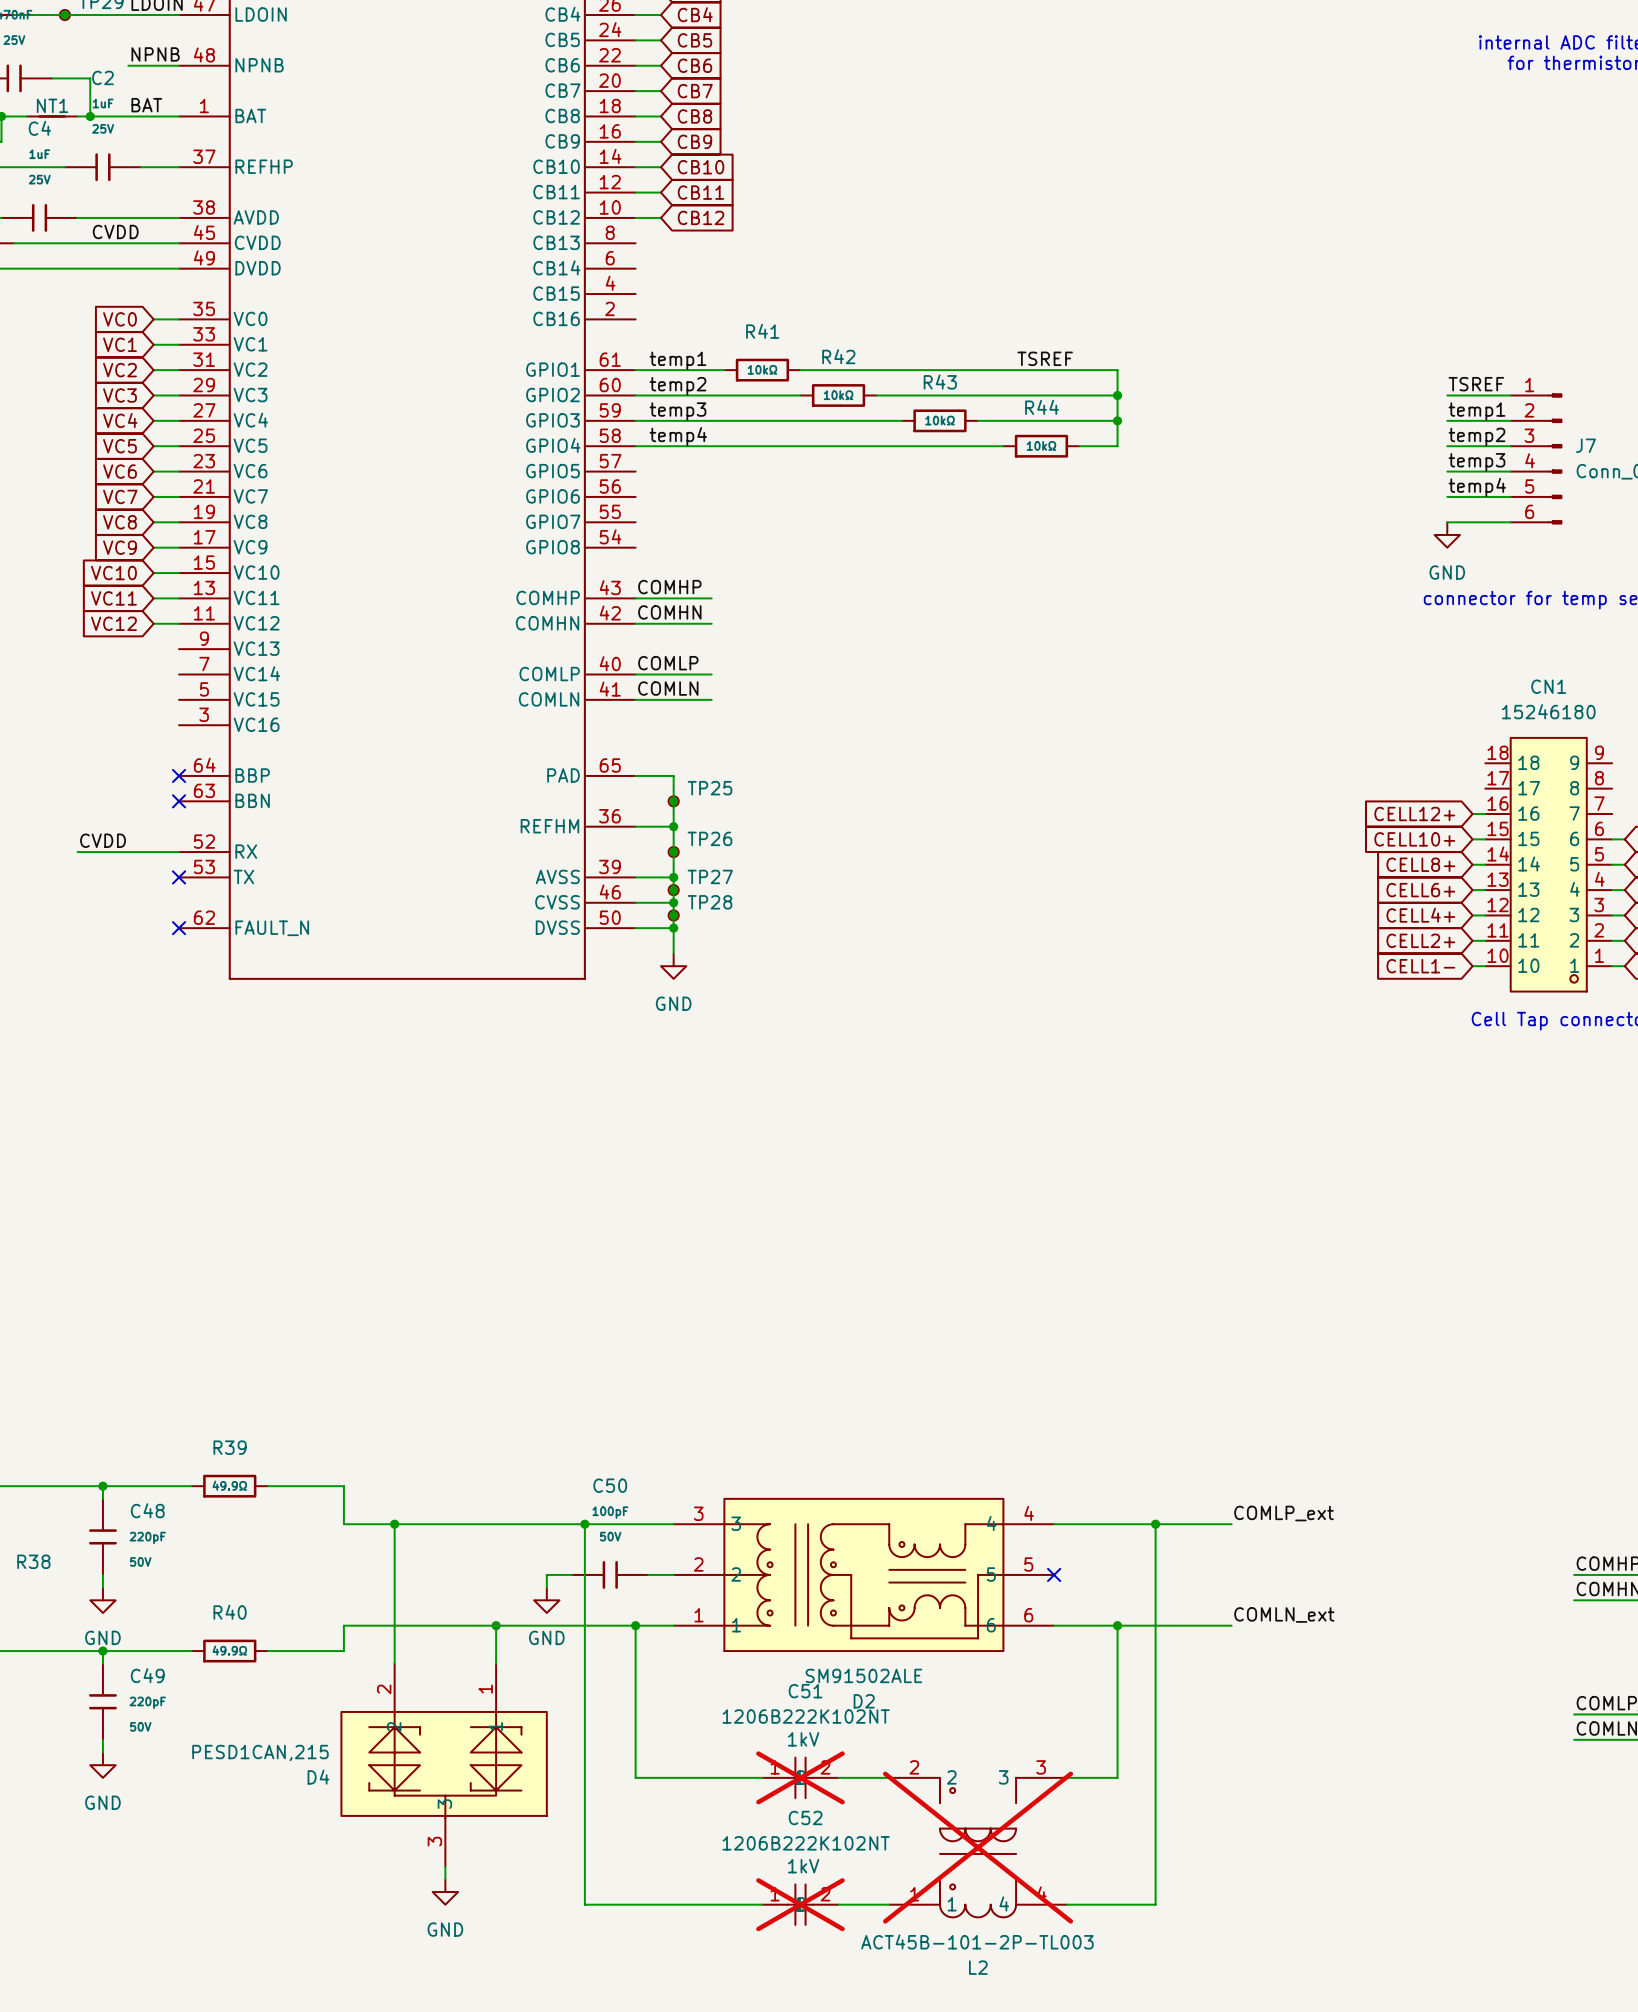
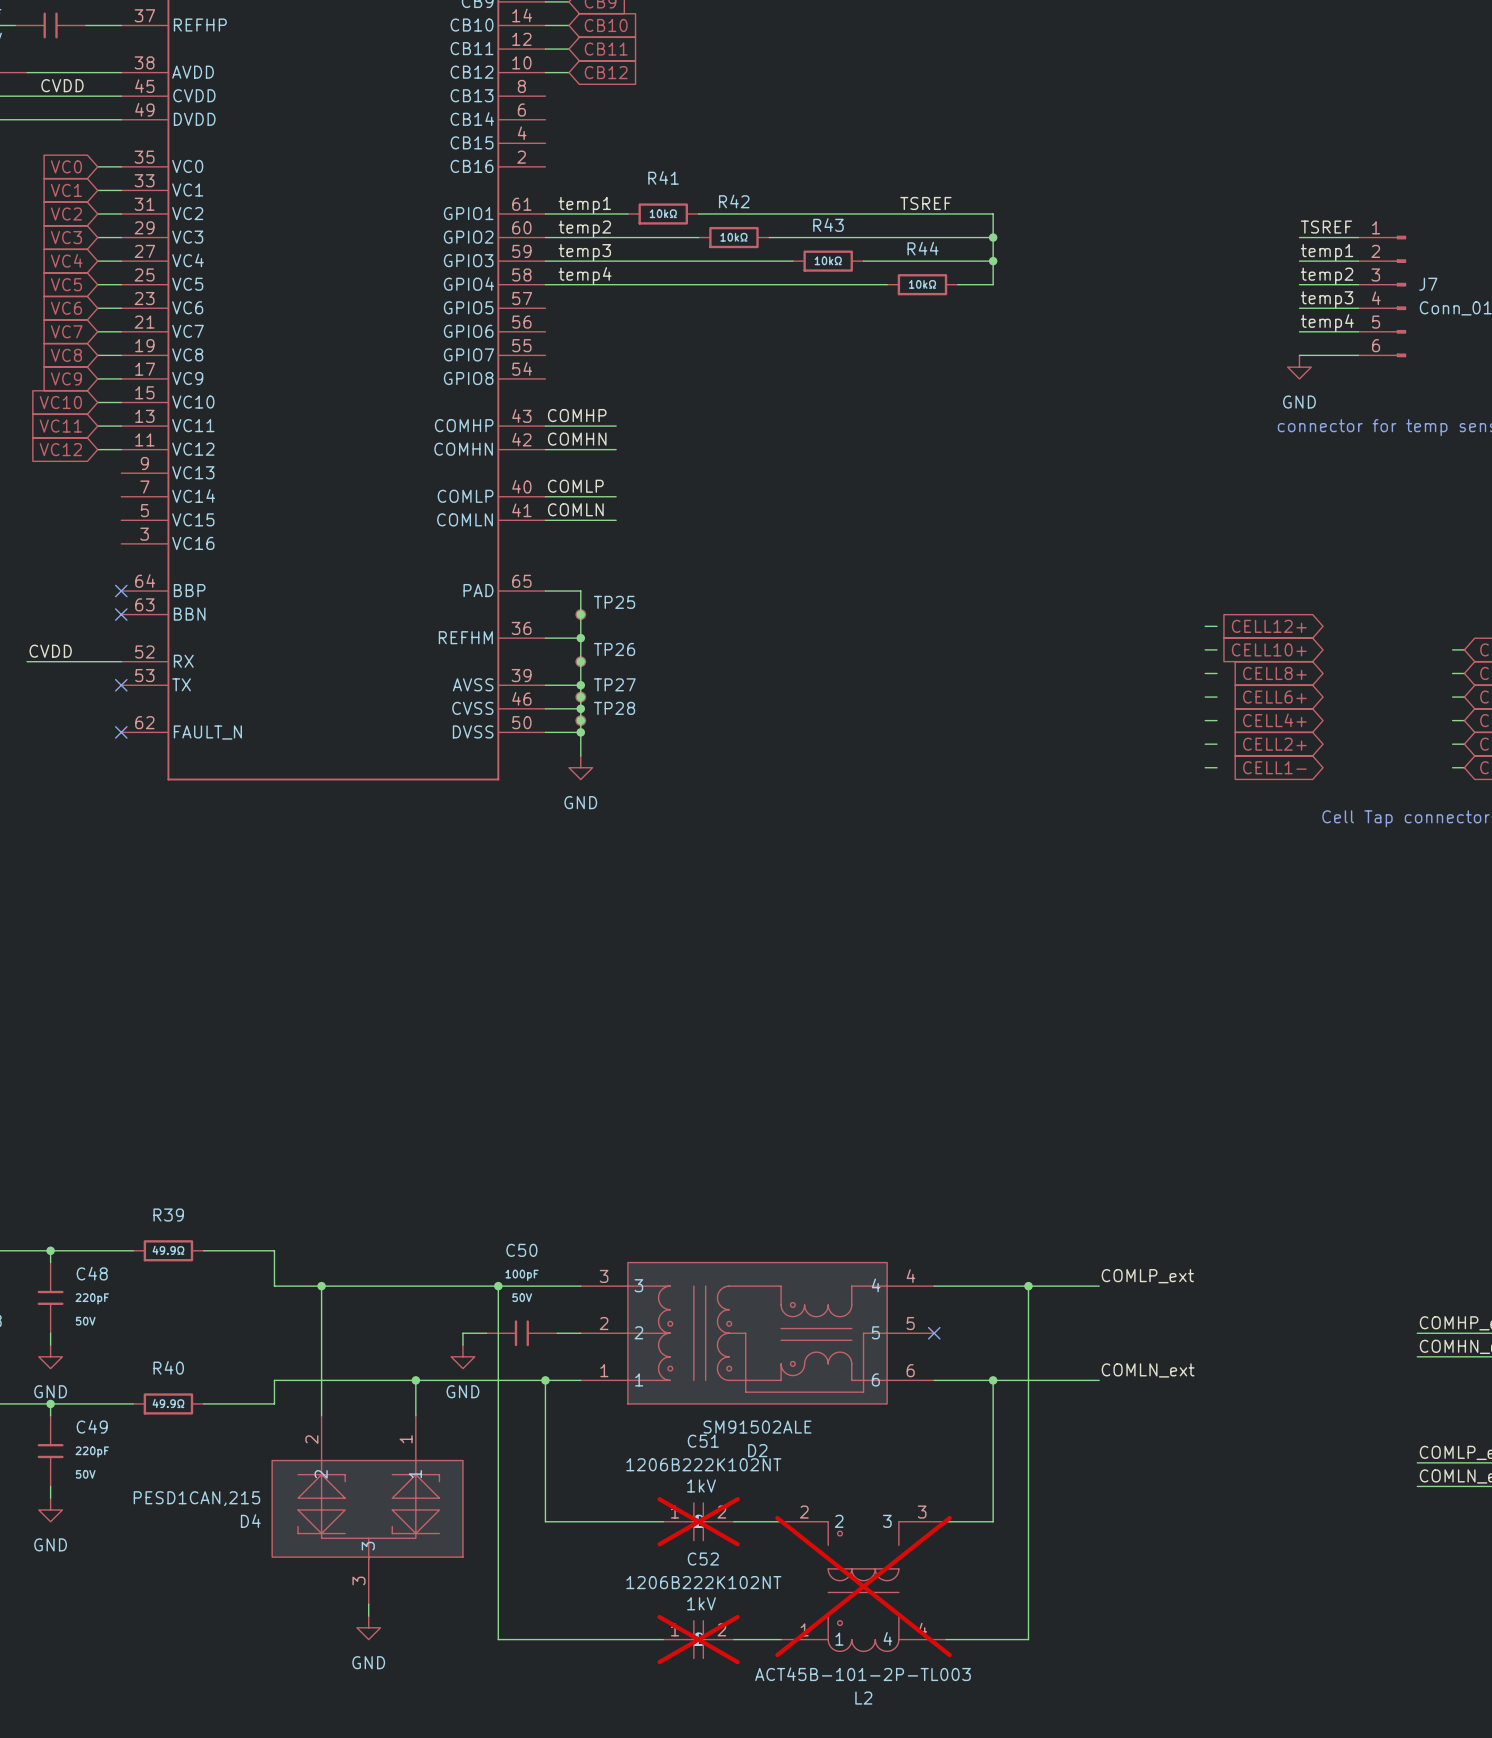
wire: (1472, 814) (1485, 814) -> (1205, 626) (1217, 626)
wire: (1472, 839) (1485, 839) -> (1205, 649) (1217, 649)
wire: (1472, 864) (1485, 864) -> (1205, 673) (1217, 673)
CN1: 15246180 (1548, 864) -> none
wire: (1472, 890) (1485, 890) -> (1205, 697) (1217, 697)
wire: (1472, 915) (1485, 915) -> (1205, 720) (1217, 720)
wire: (1472, 940) (1485, 940) -> (1205, 744) (1217, 744)
wire: (1472, 966) (1485, 966) -> (1205, 767) (1217, 767)

